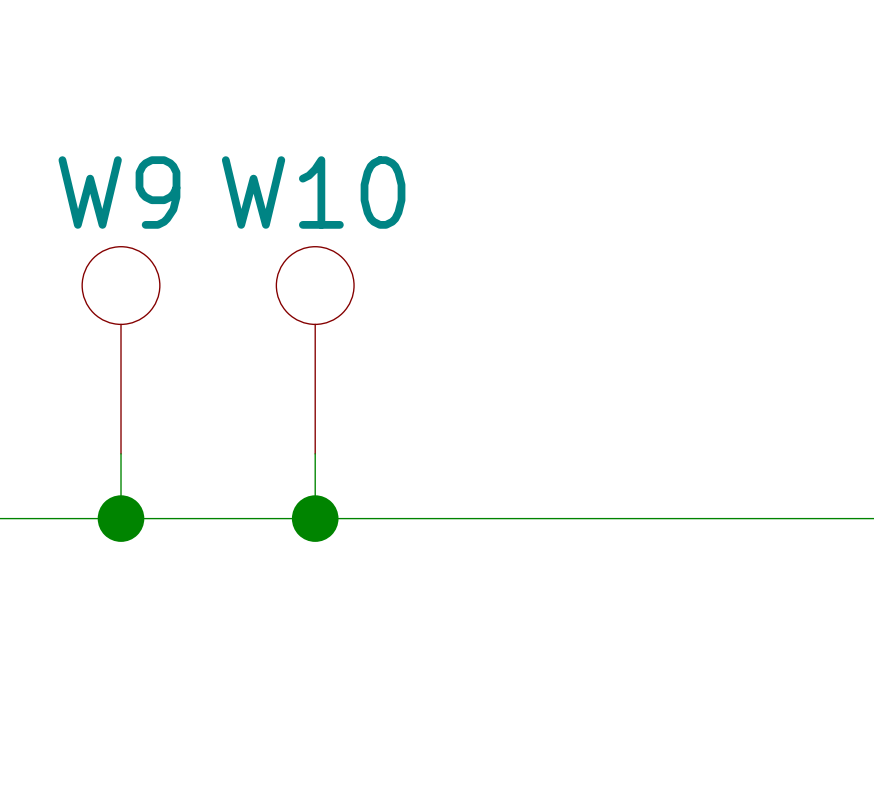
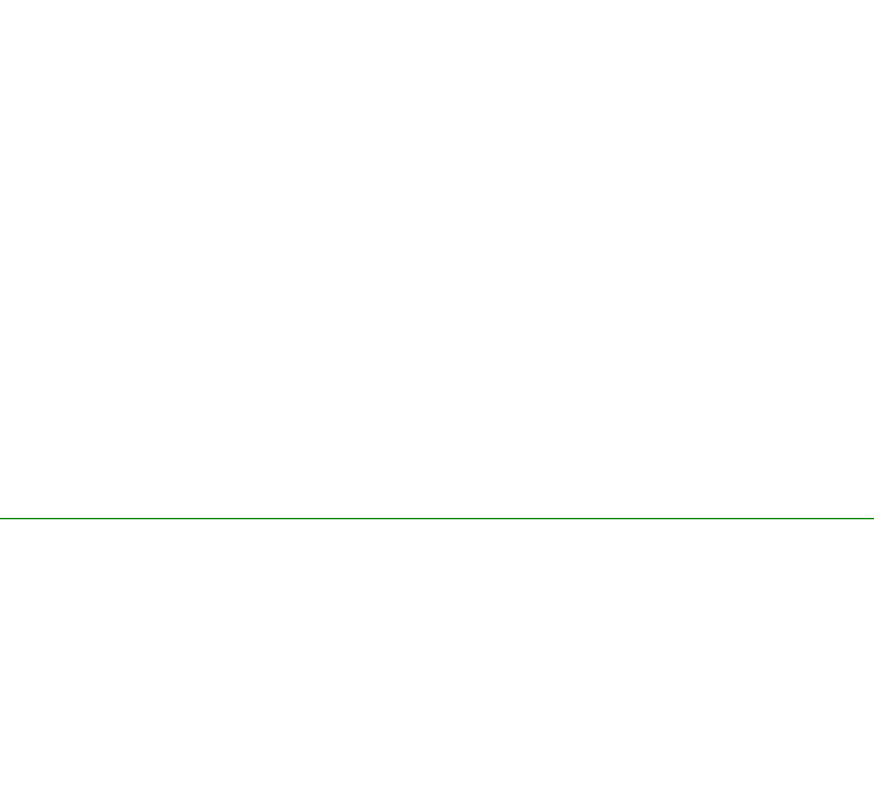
W9: (121, 350) -> none
W10: (315, 350) -> none
wire: (121, 453) (121, 518) -> none
wire: (315, 453) (315, 518) -> none
junction: (121, 518) -> none
junction: (315, 518) -> none

